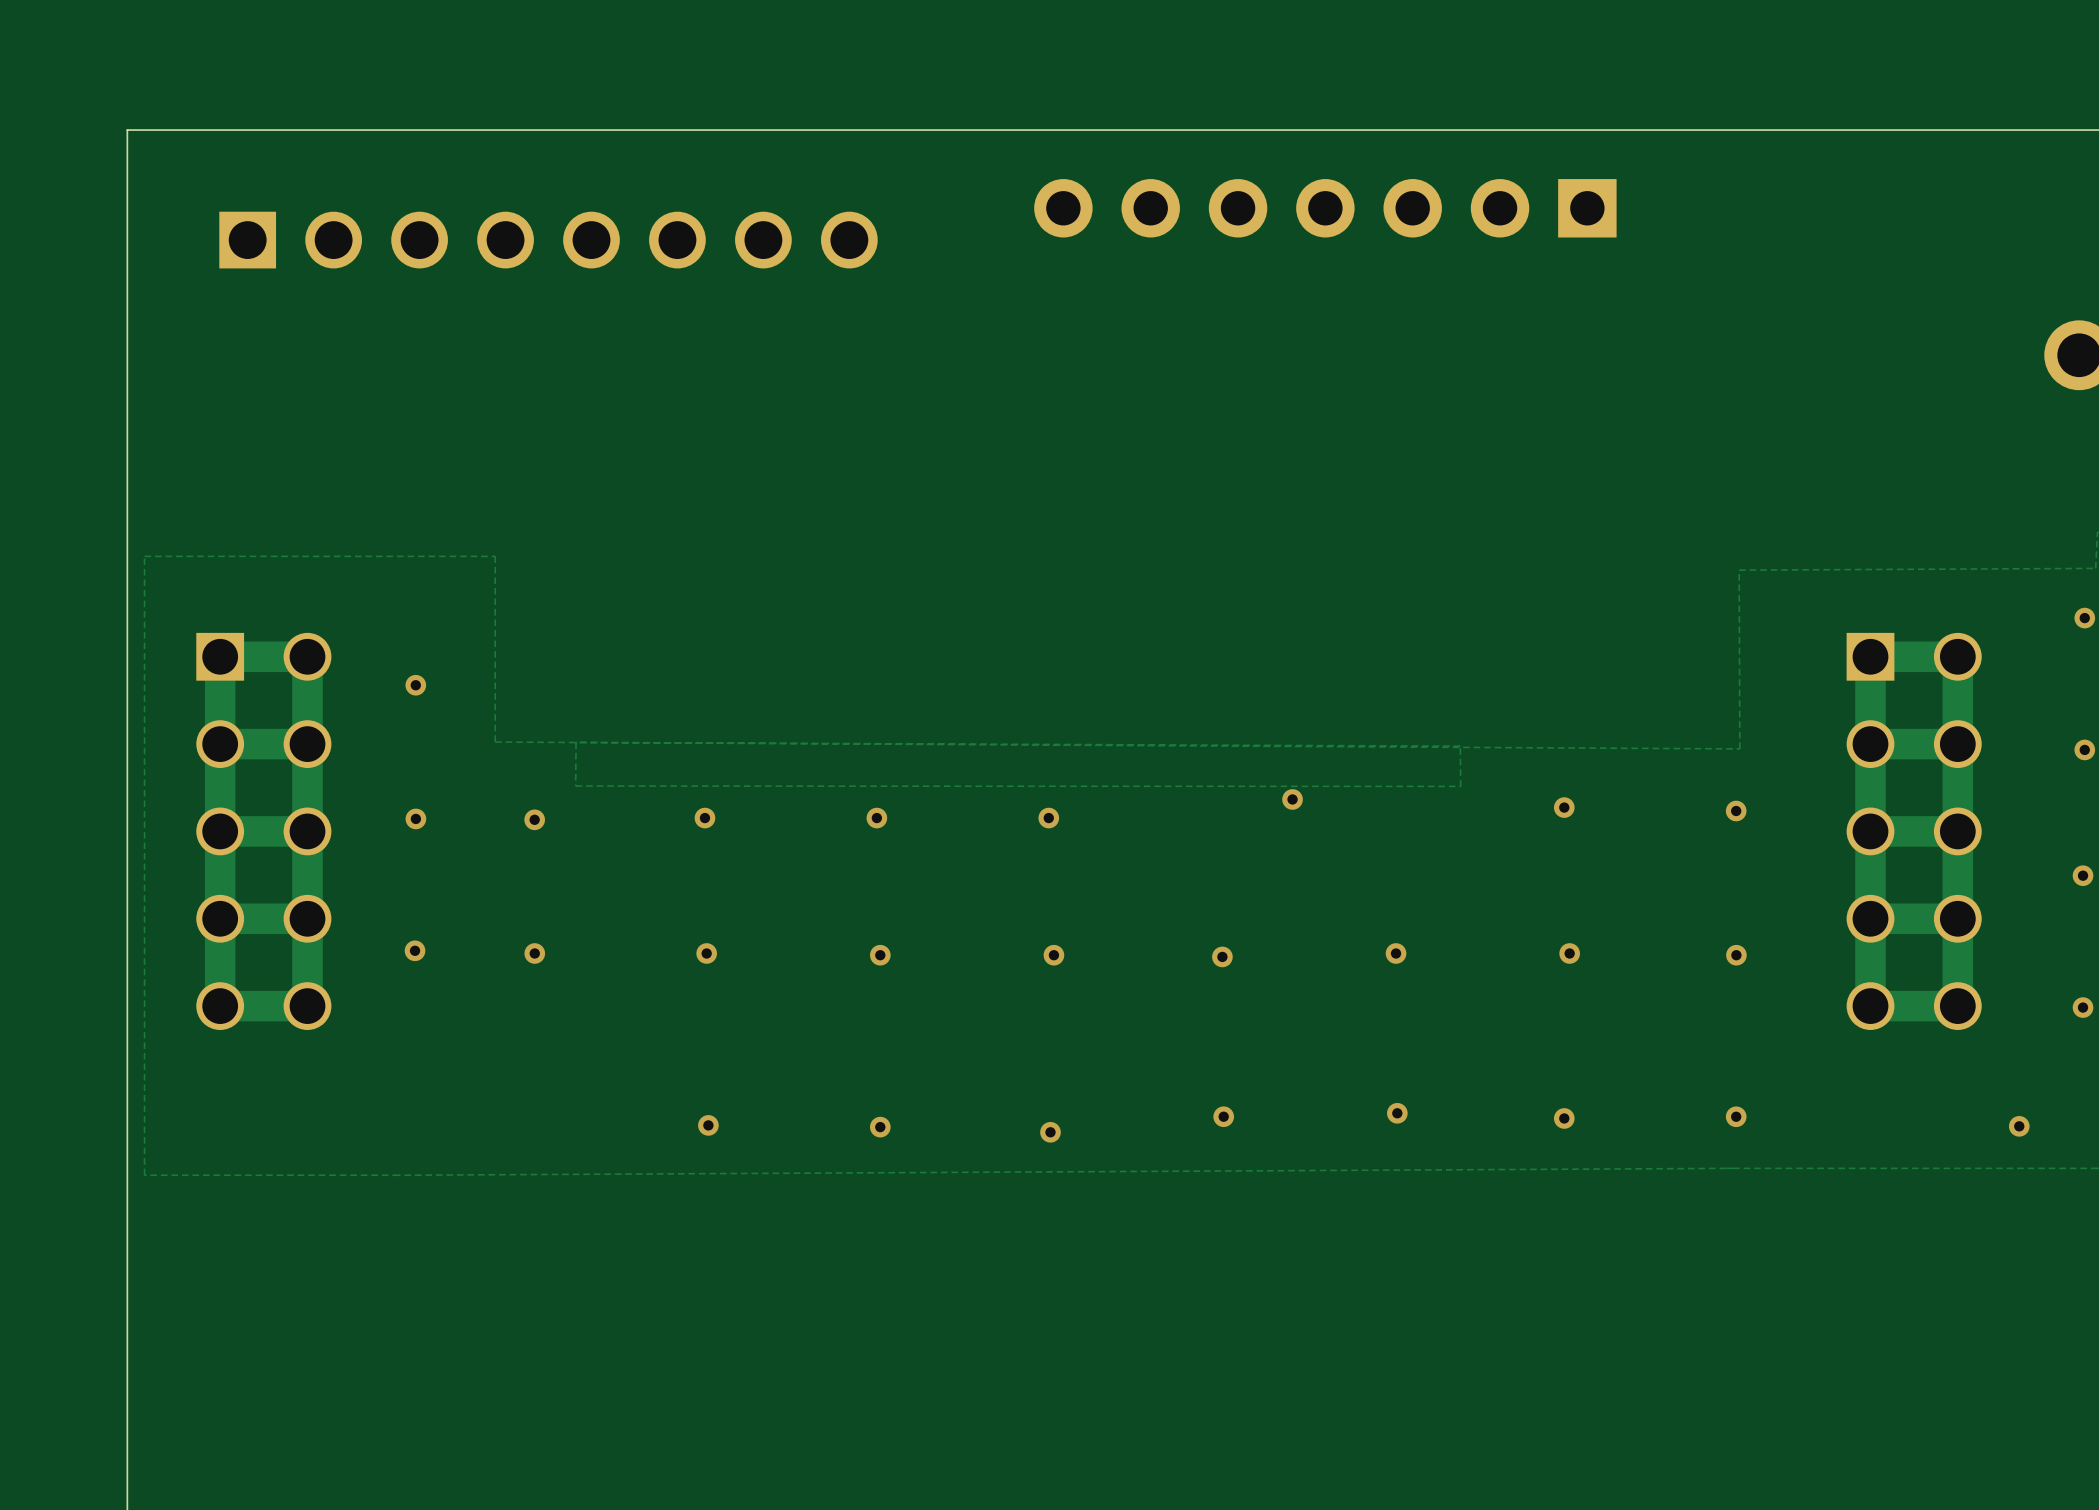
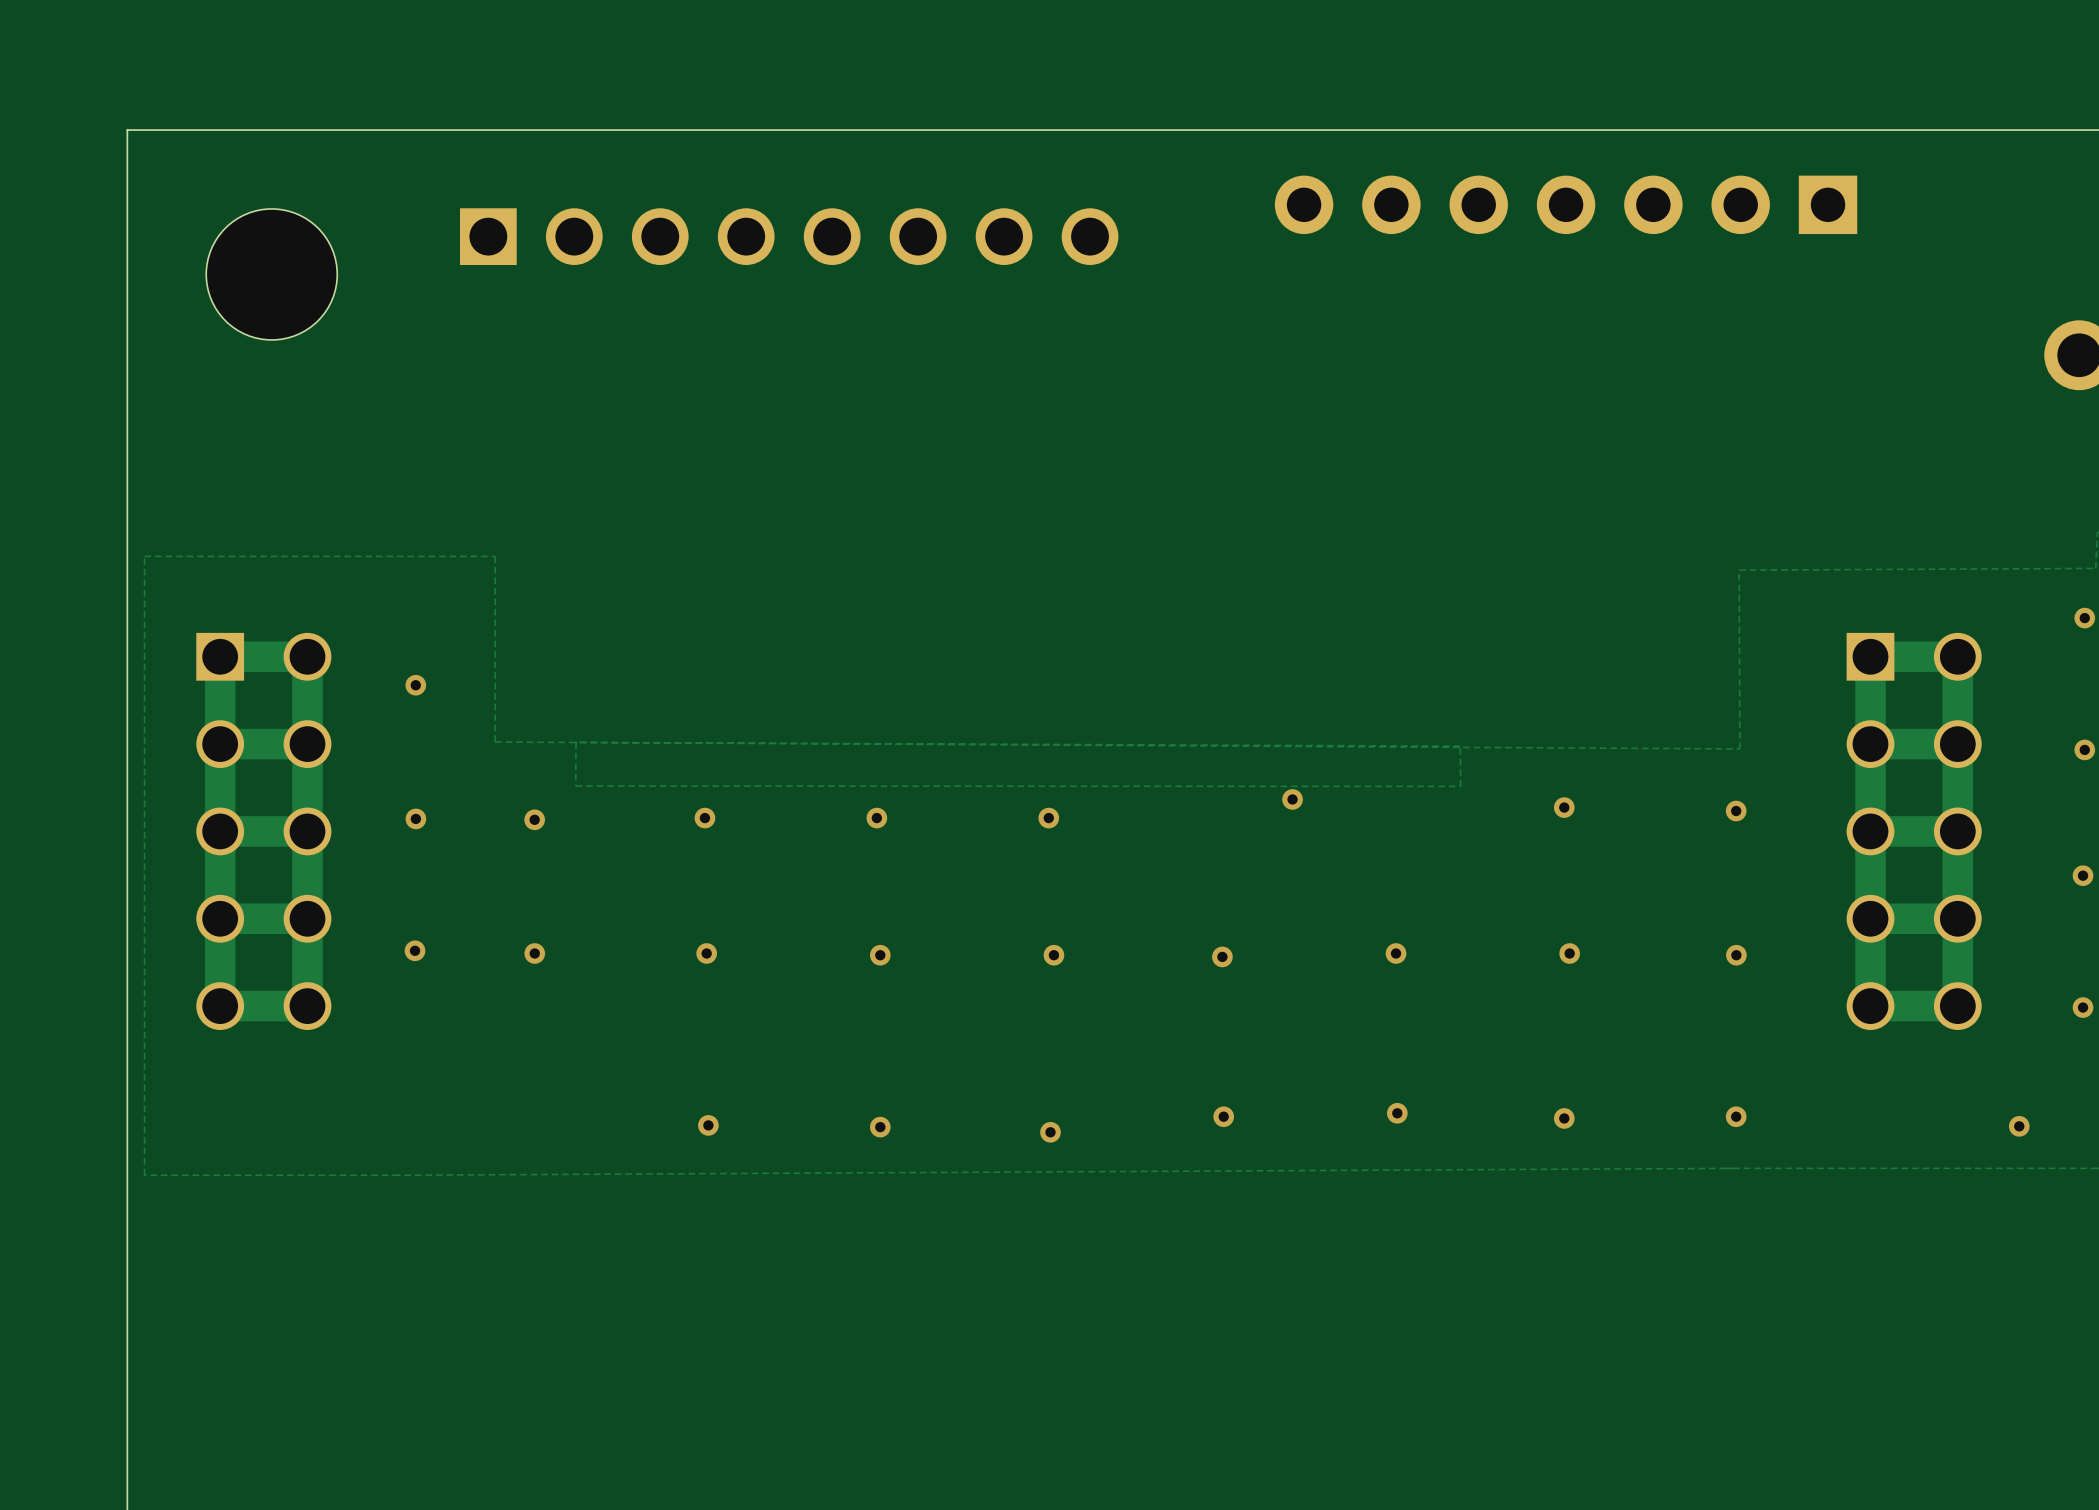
part position: (1325, 208) -> (1566, 204)
part position: (548, 240) -> (789, 236)
part: none -> (271, 274)

